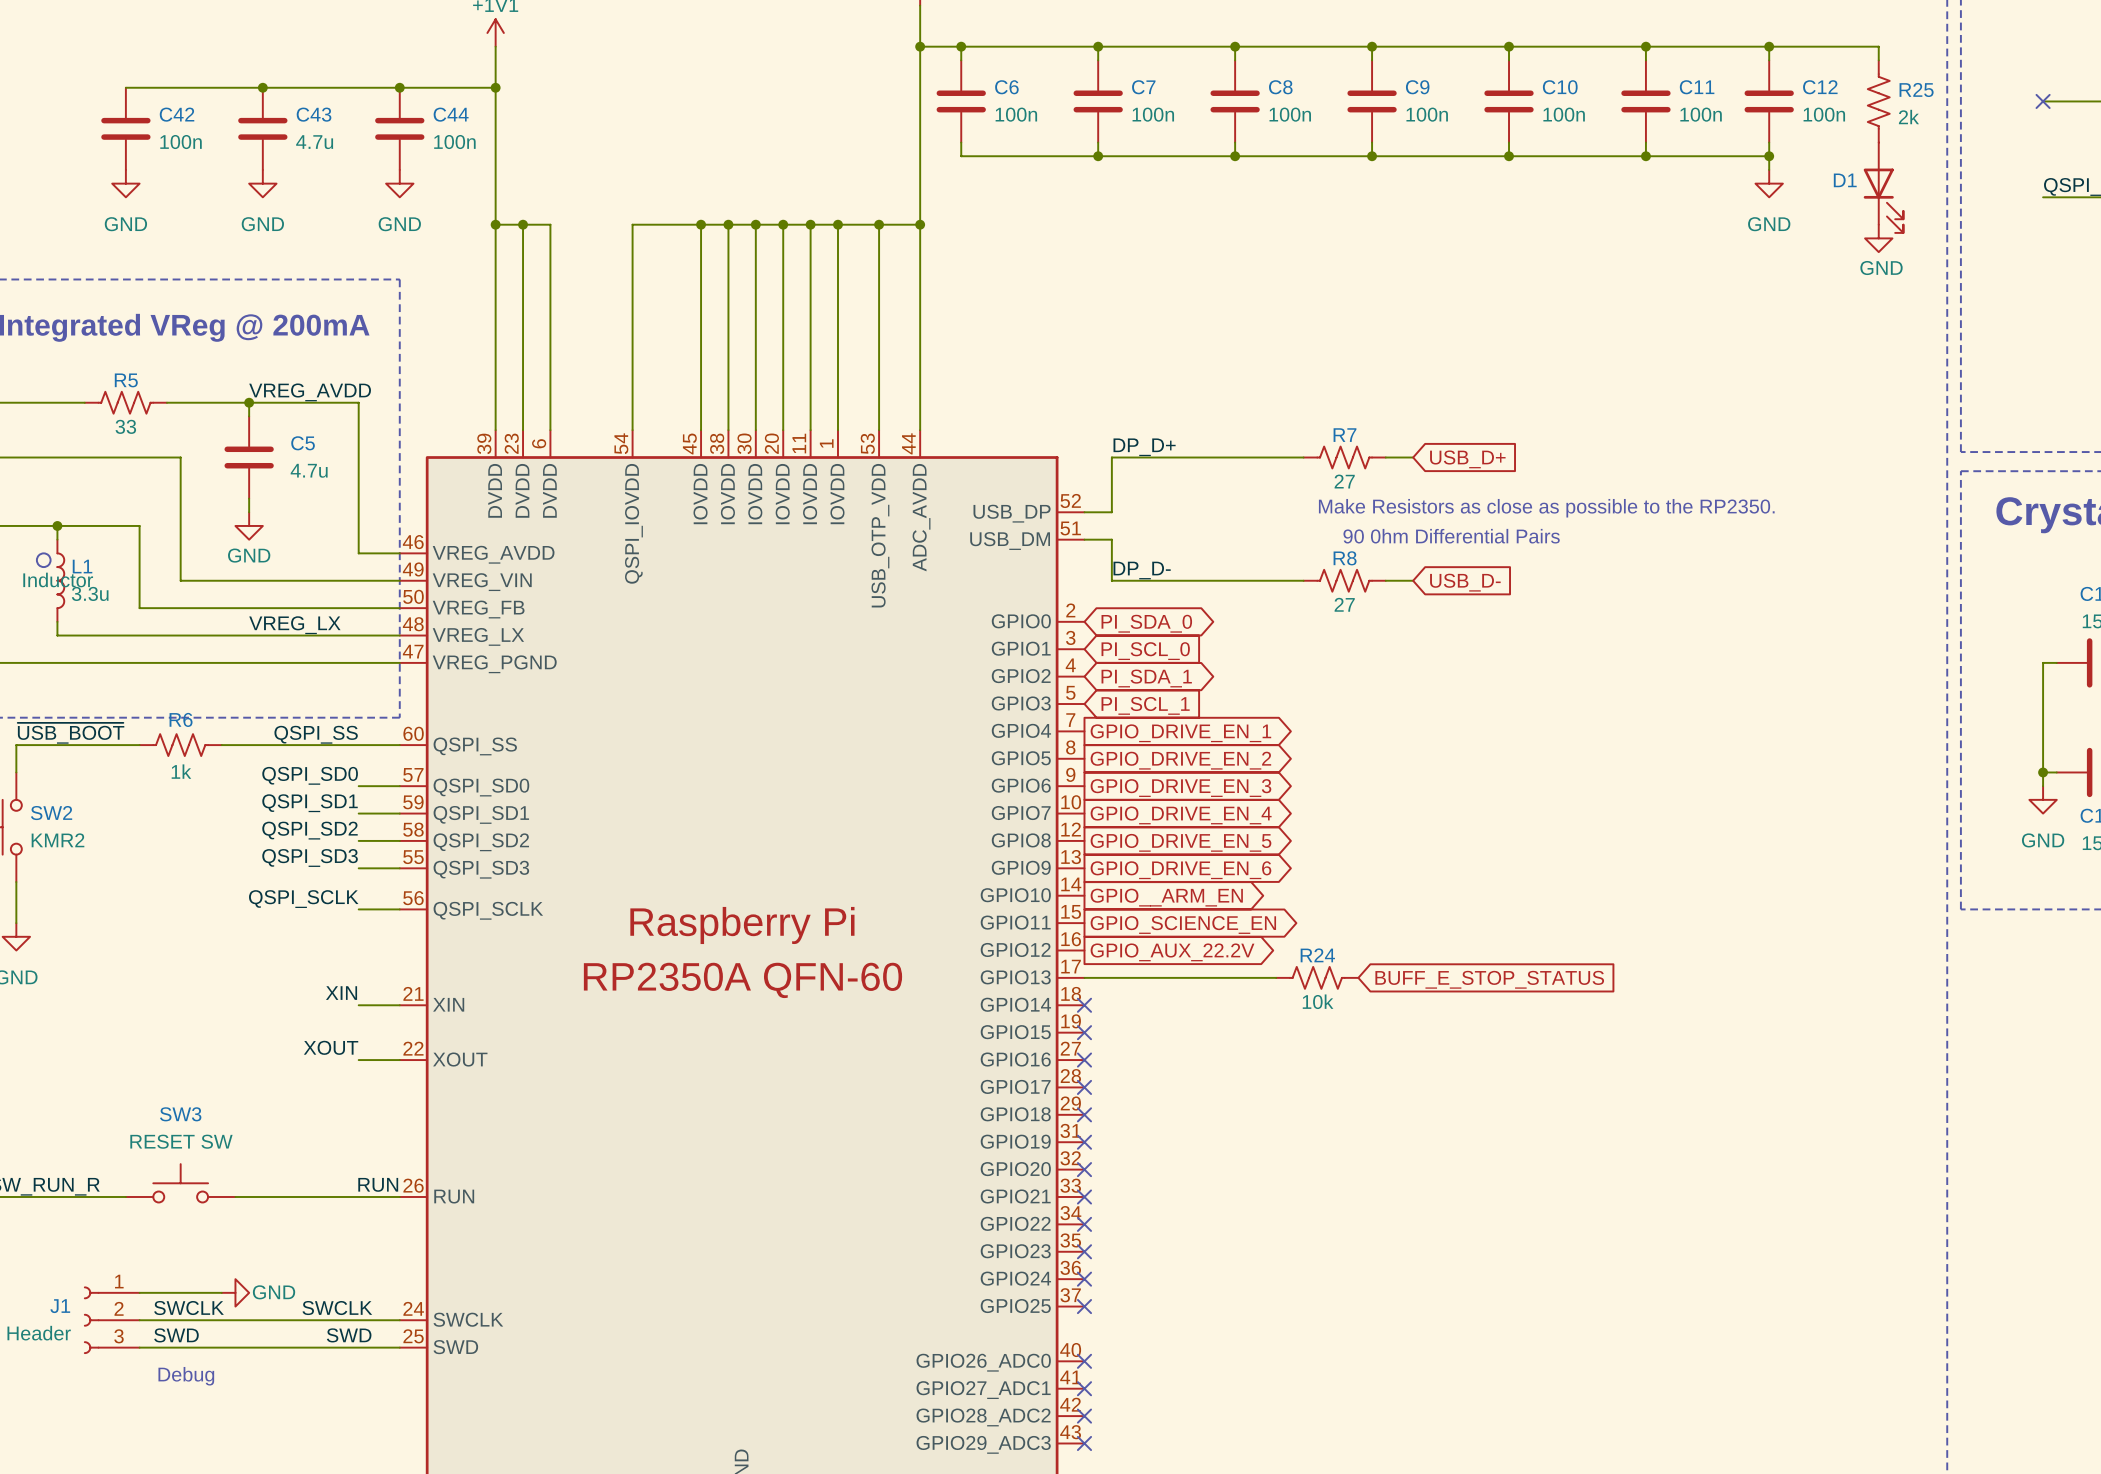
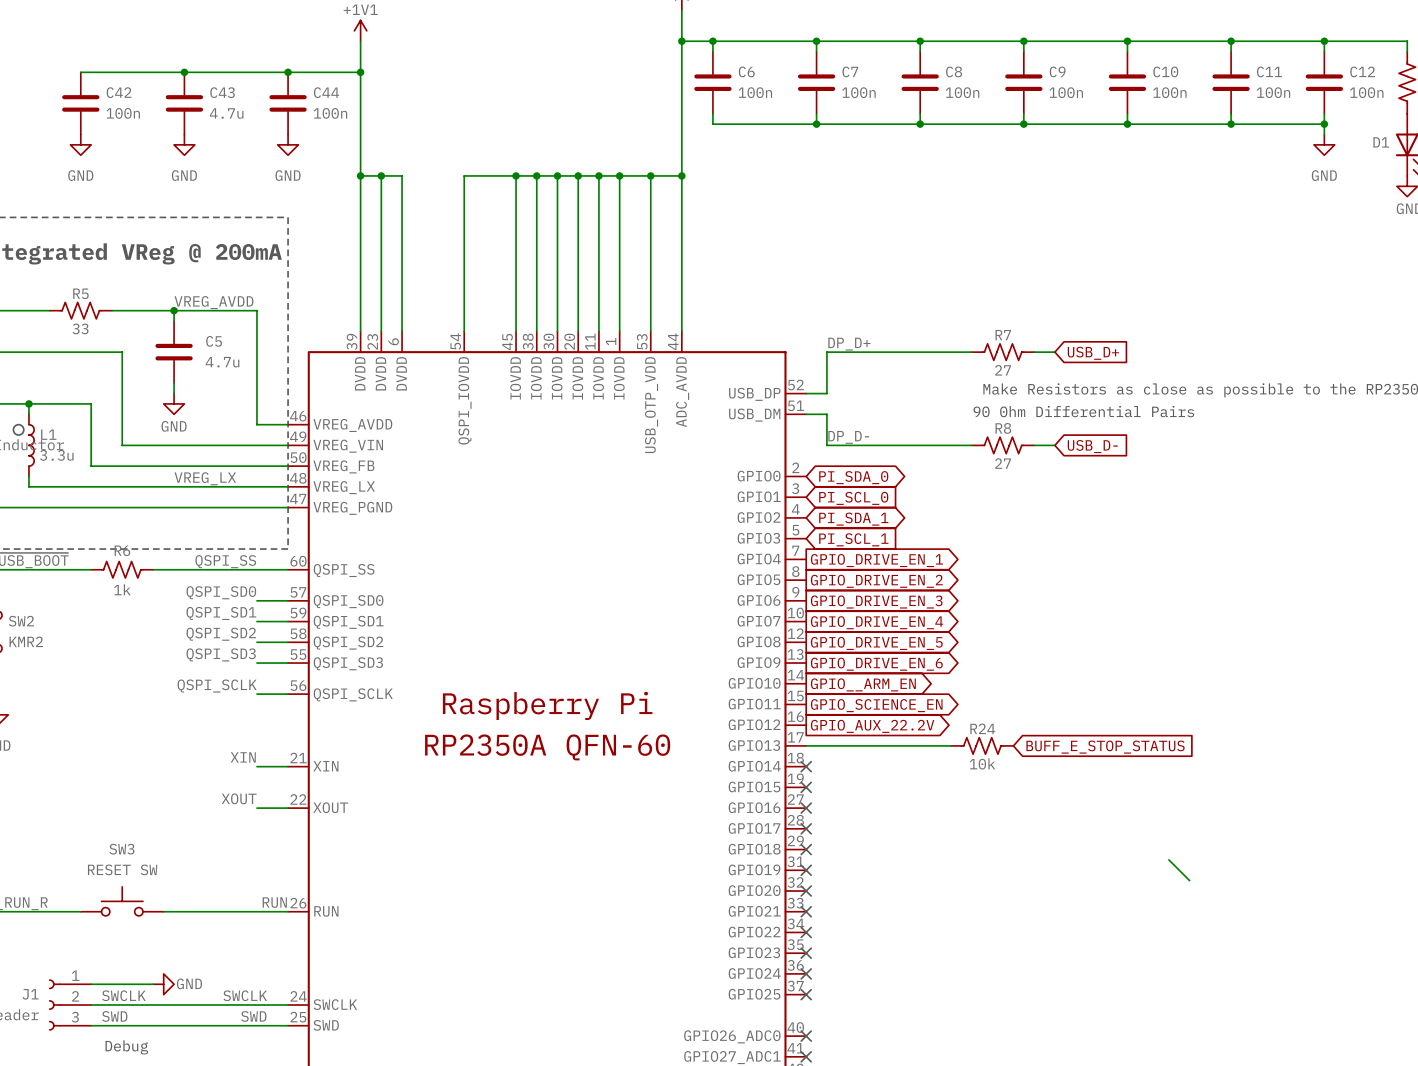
wire: none -> (1168, 859) (1189, 880)

